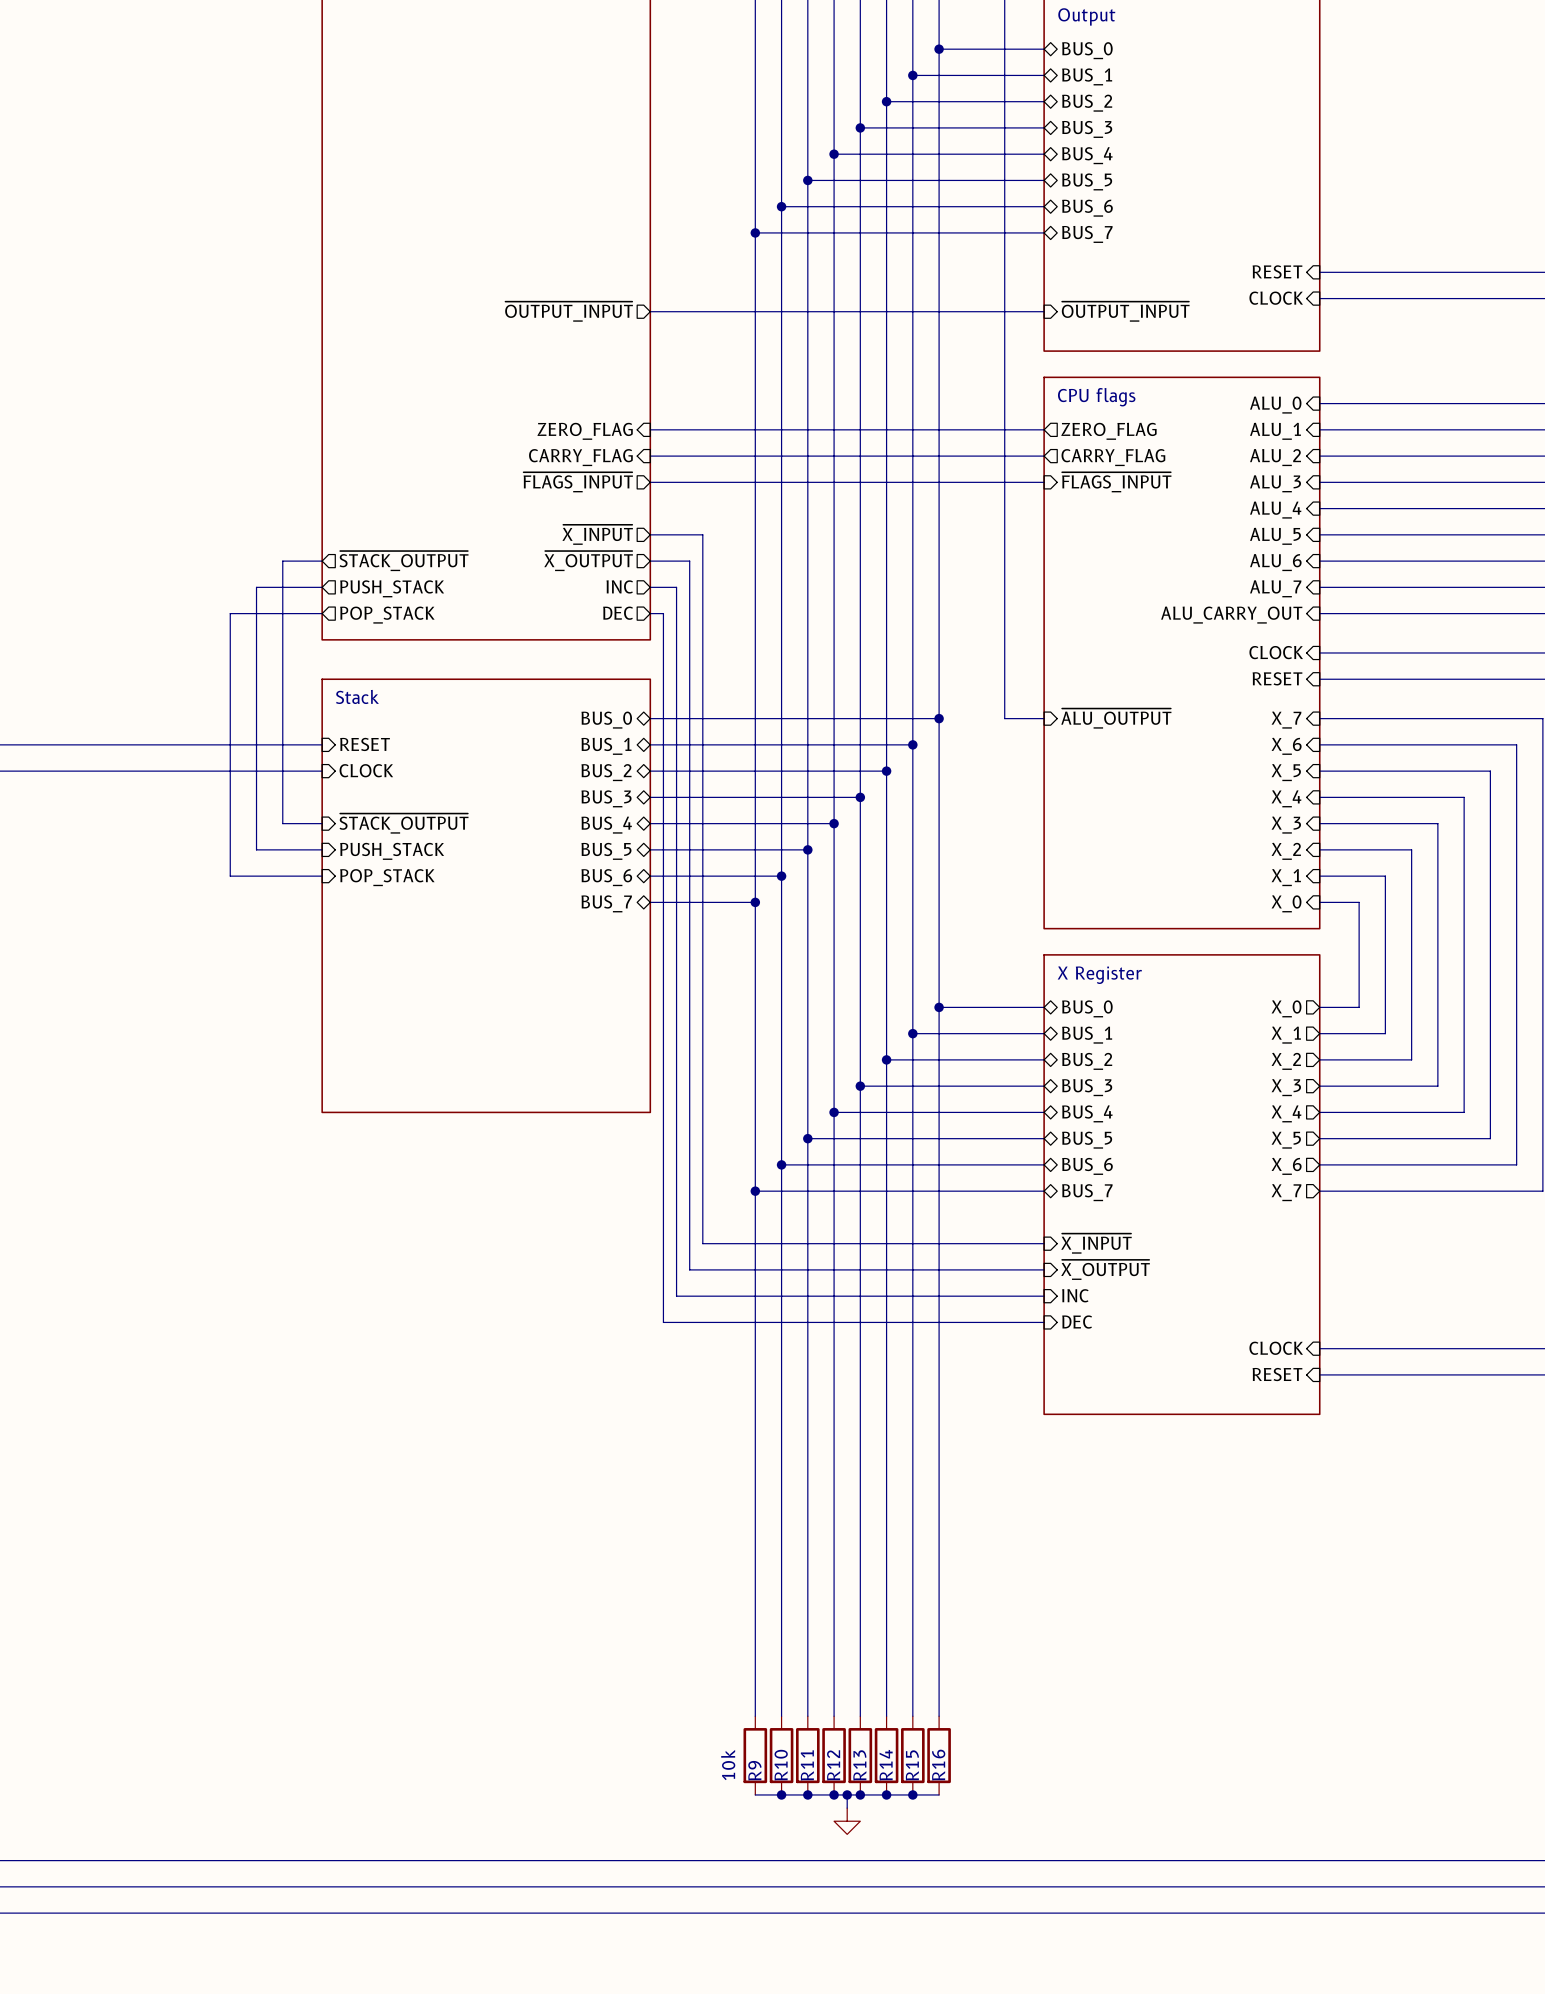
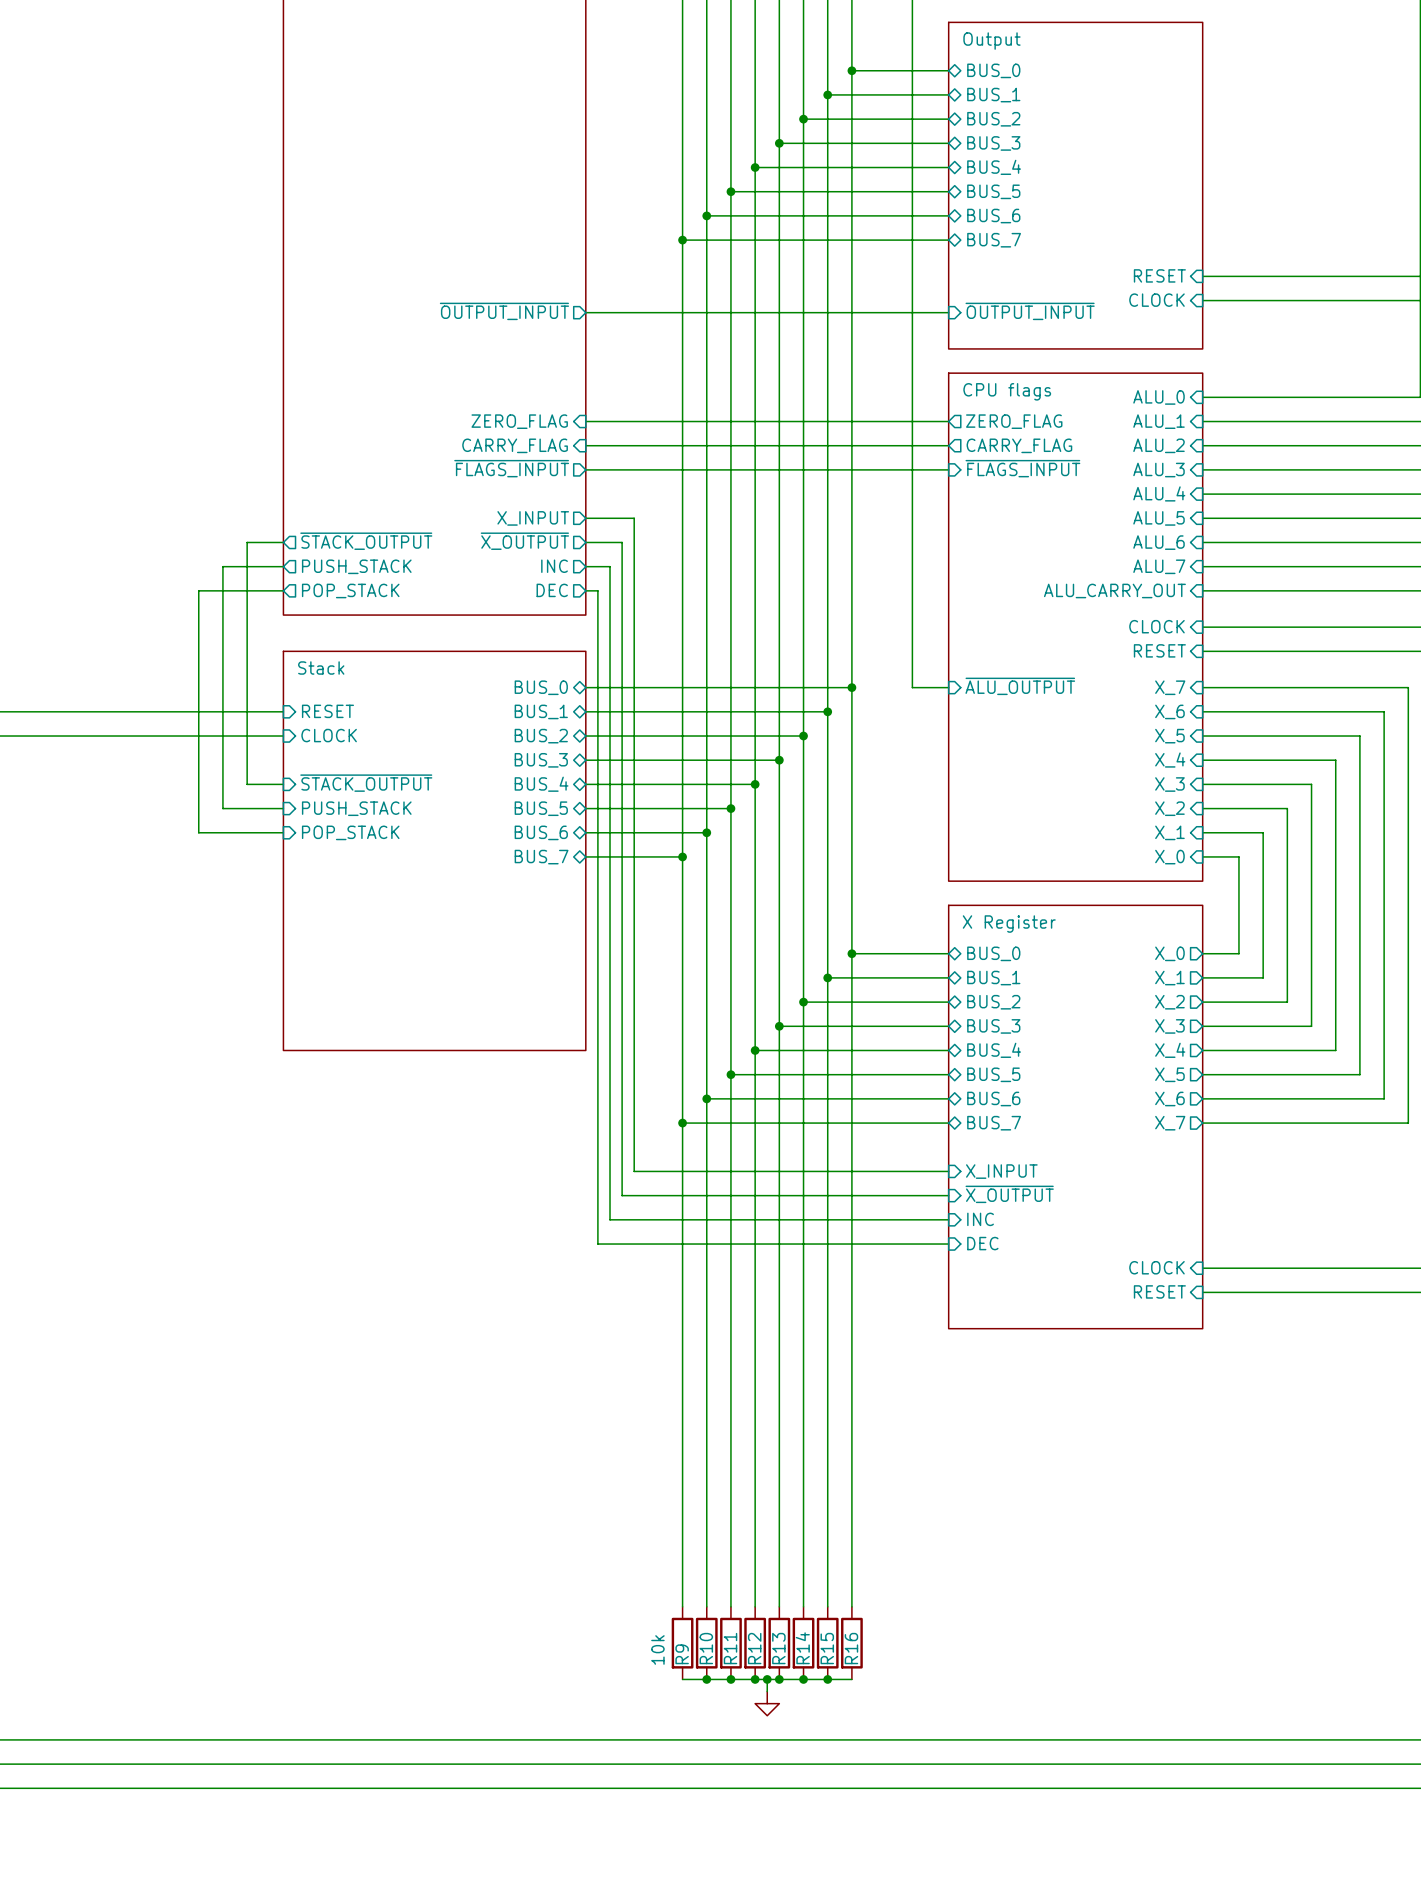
sheet pin: ~{X_INPUT} (597, 534) -> X_INPUT (533, 518)
sheet pin: ~{X_INPUT} (1096, 1243) -> X_INPUT (1001, 1171)

